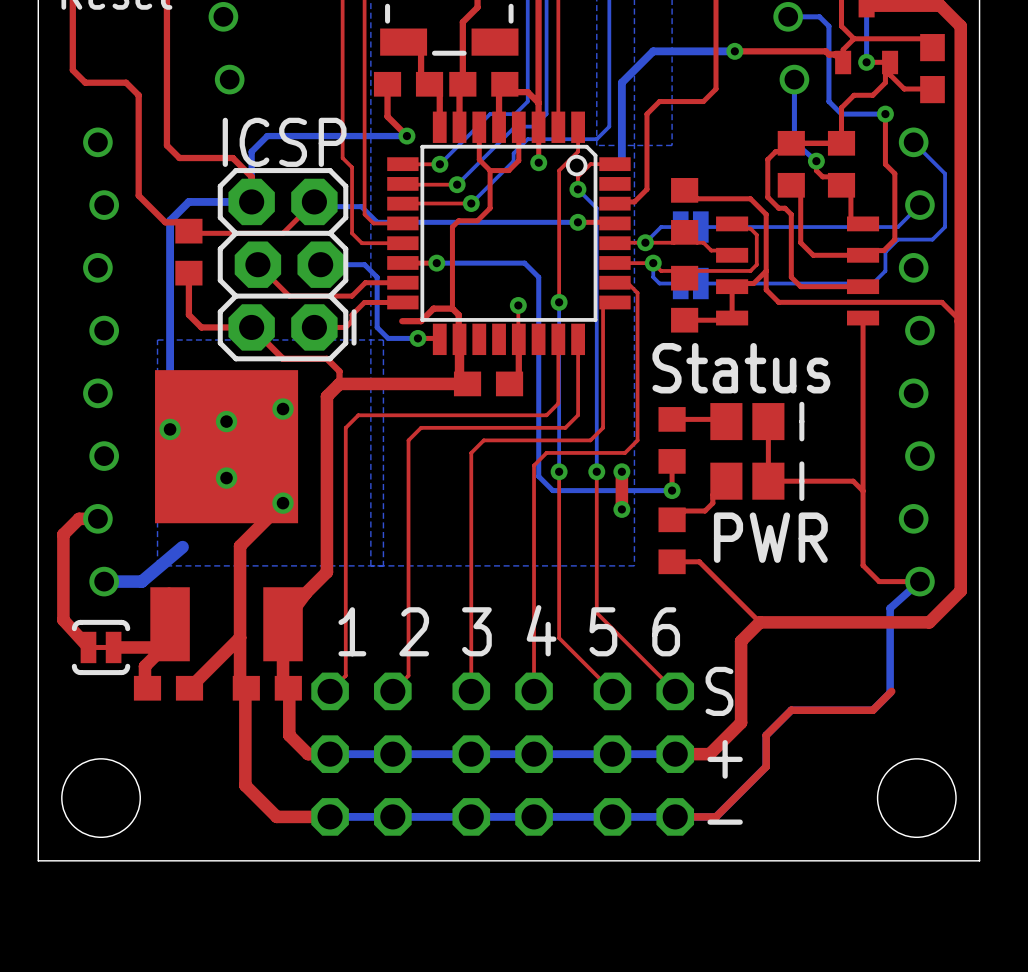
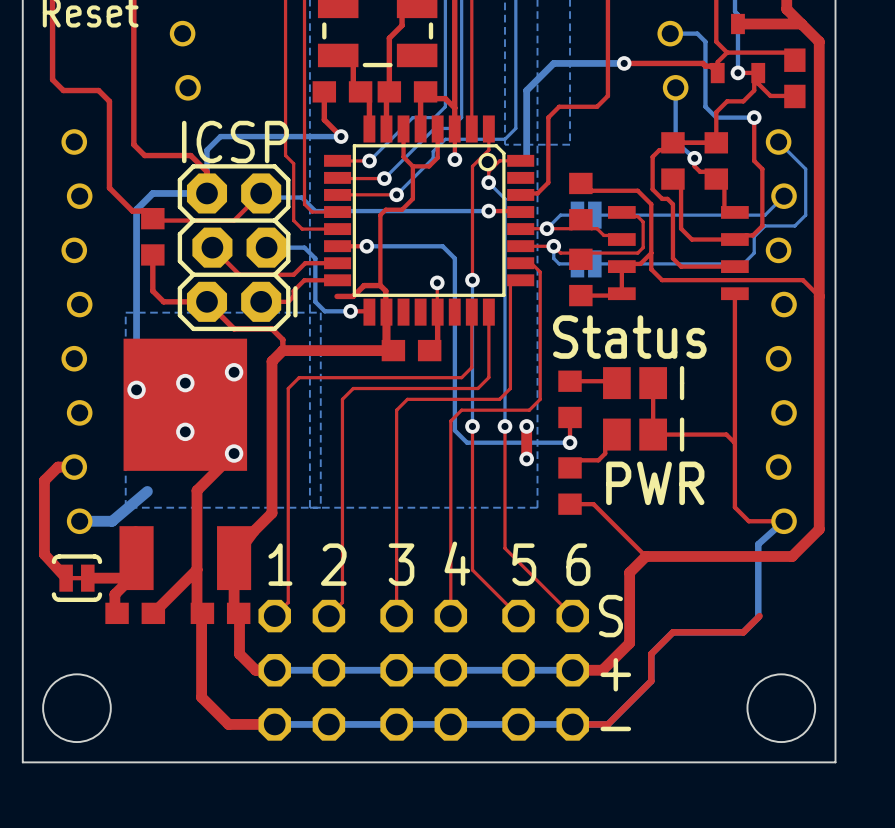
text position: 1 (352, 631) -> 1 (280, 564)
text position: 2 (414, 631) -> 2 (333, 564)
text position: 5 (603, 631) -> 5 (524, 564)
text position: 6 (666, 631) -> 6 (578, 564)

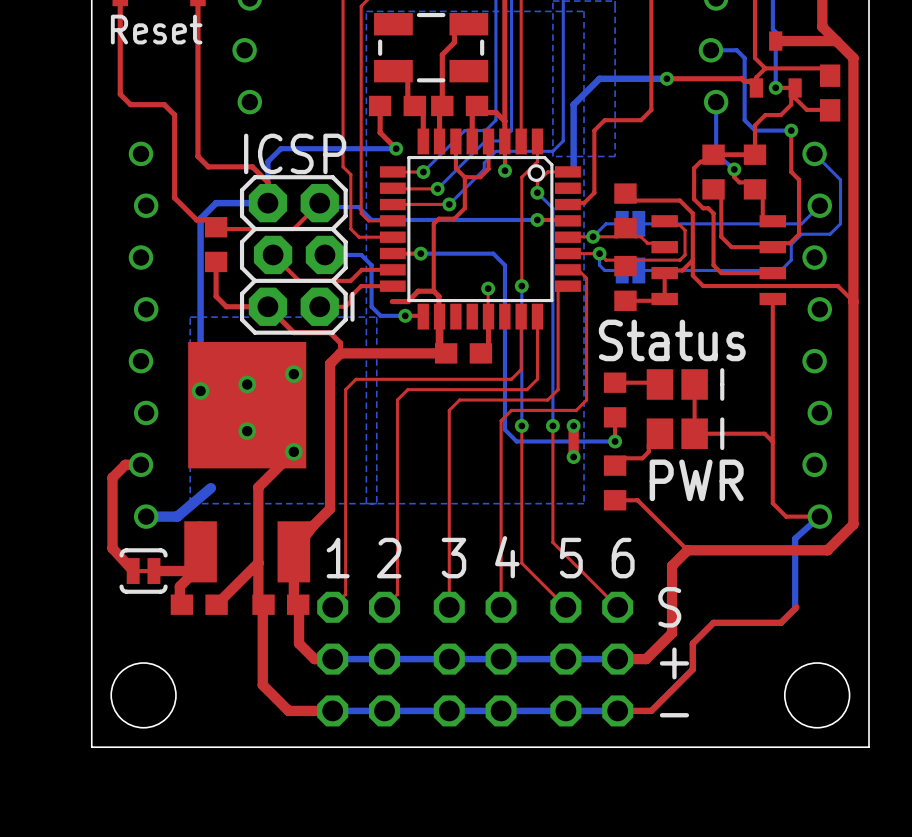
text position: S (610, 616) -> S (669, 607)
text position: + (615, 674) -> + (674, 663)
text position: - (615, 728) -> - (674, 715)

